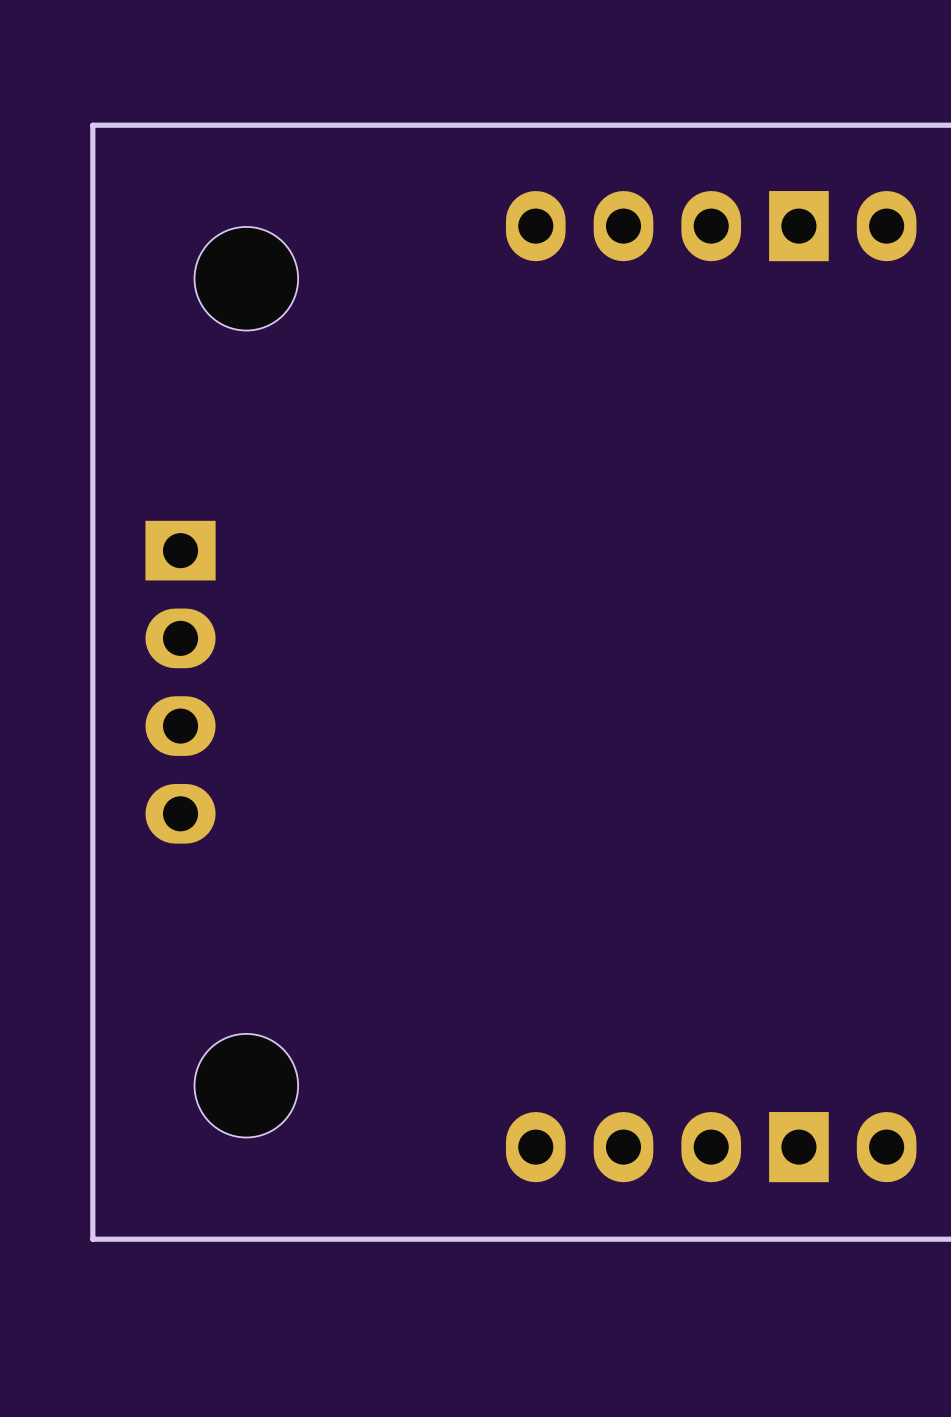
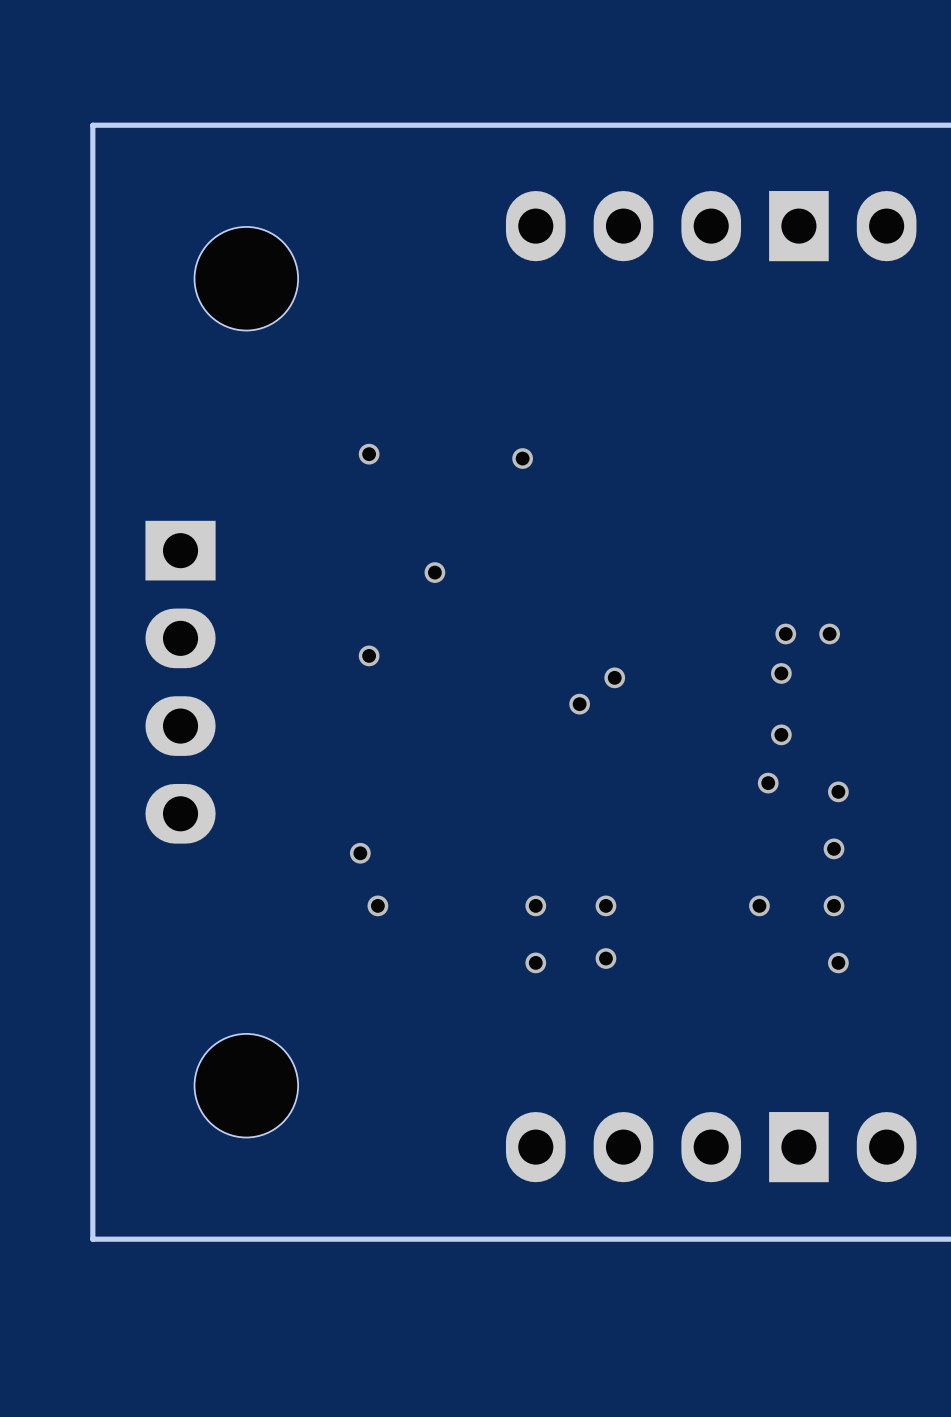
via: none -> (369, 454)
via: none -> (522, 458)
via: none -> (434, 572)
via: none -> (785, 633)
via: none -> (829, 633)
via: none -> (369, 655)
via: none -> (781, 673)
via: none -> (614, 677)
via: none -> (579, 704)
via: none -> (781, 734)
via: none -> (768, 783)
via: none -> (838, 791)
via: none -> (834, 848)
via: none -> (360, 853)
via: none -> (377, 905)
via: none -> (535, 905)
via: none -> (605, 905)
via: none -> (759, 905)
via: none -> (834, 905)
via: none -> (605, 958)
via: none -> (535, 962)
via: none -> (838, 962)

